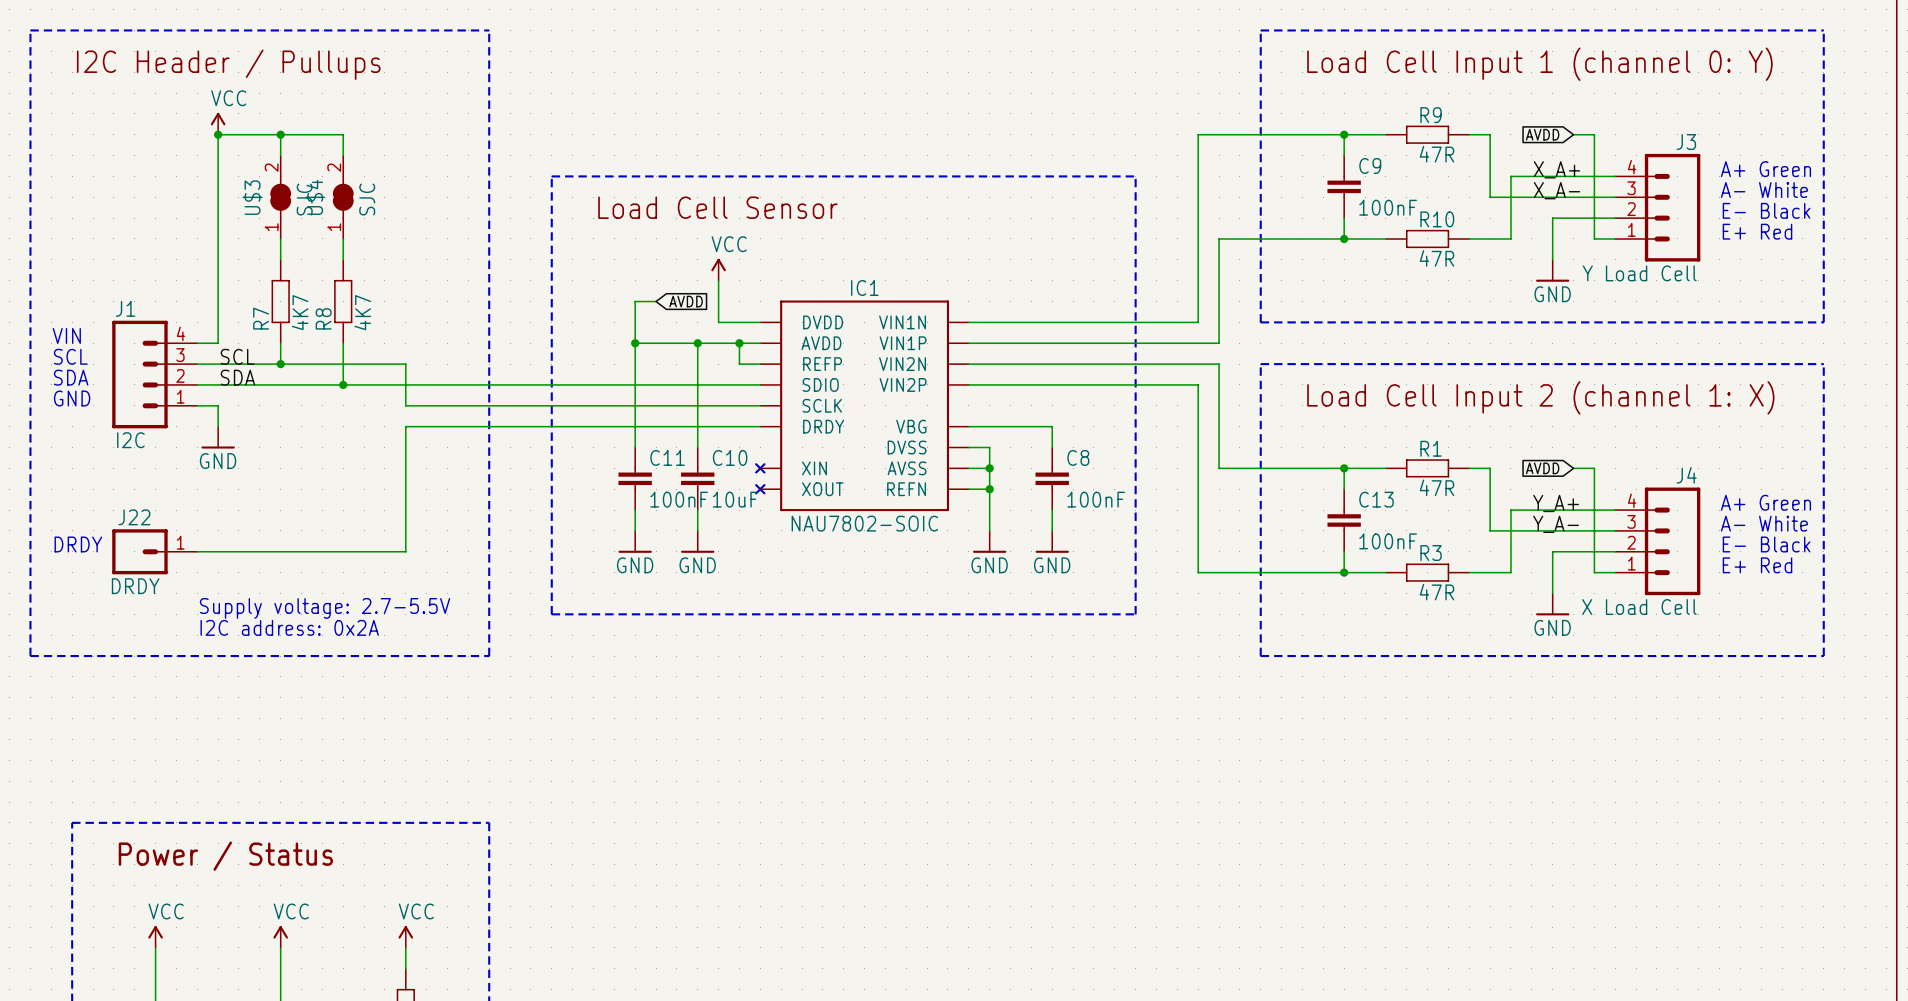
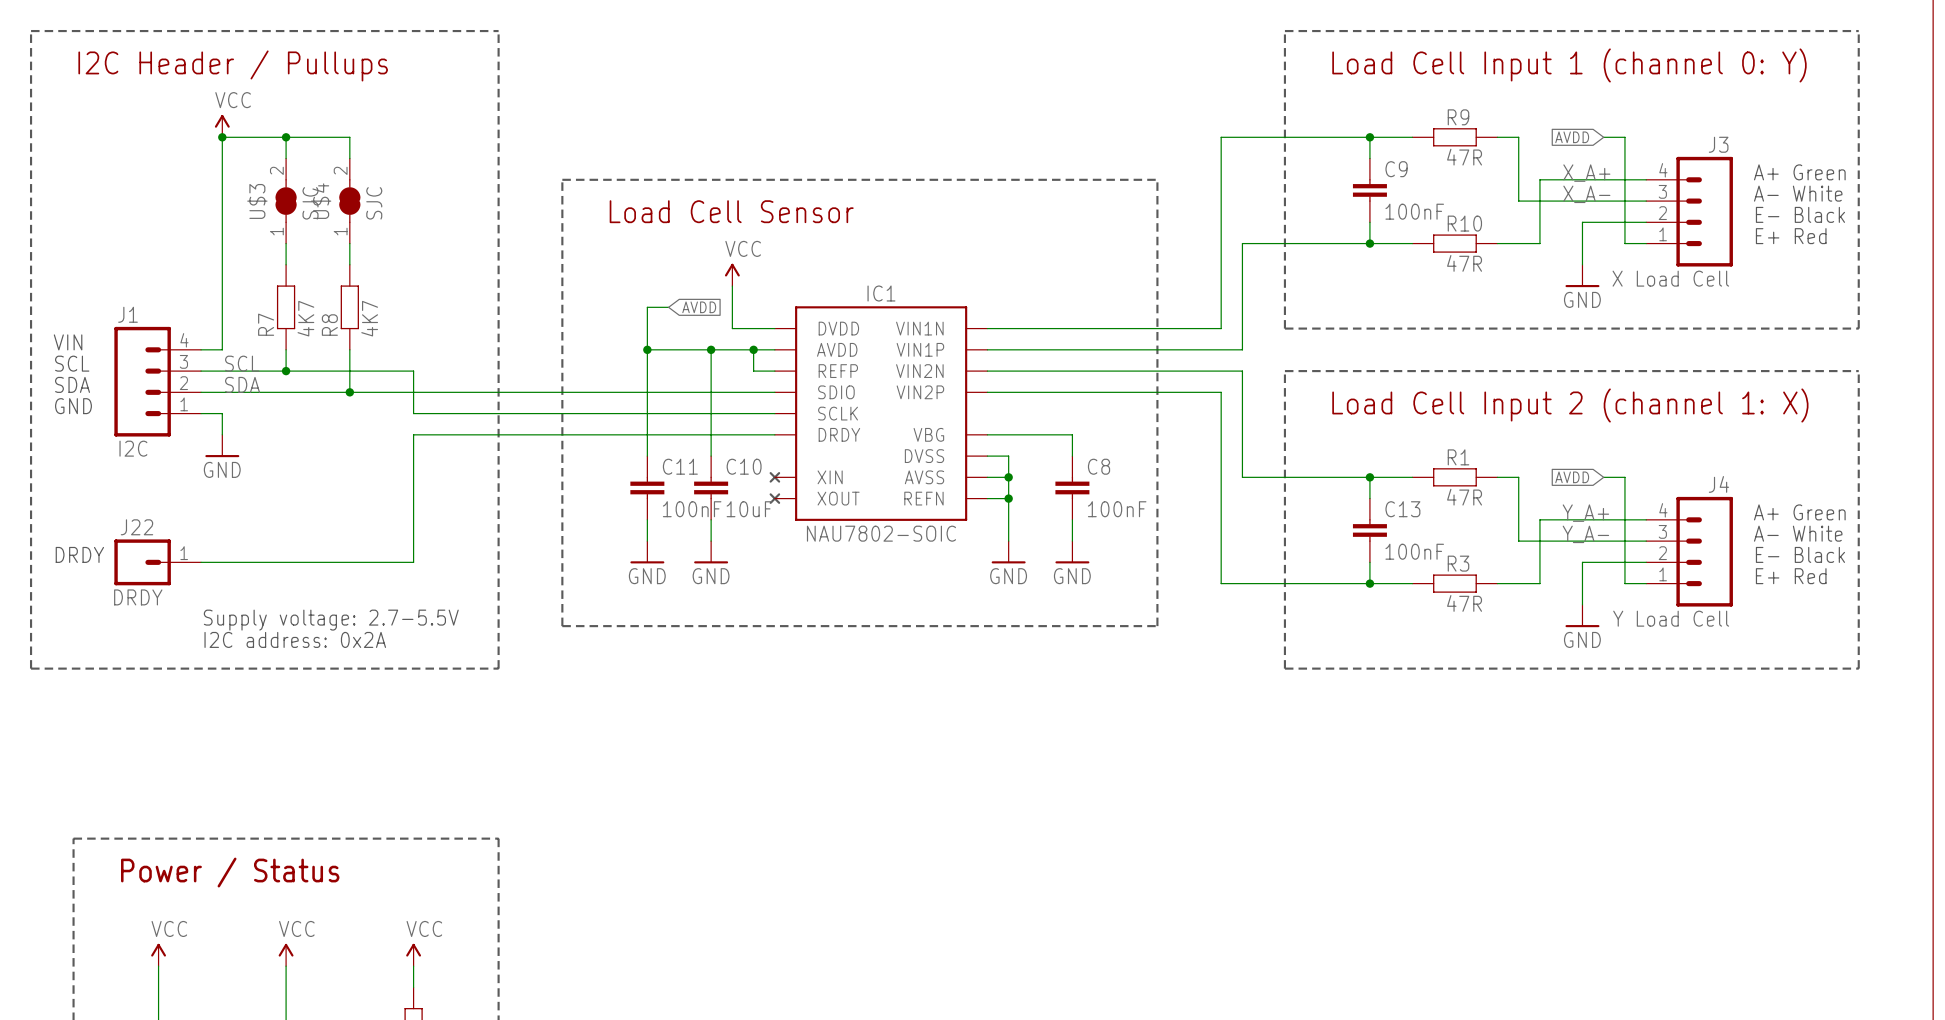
J3 value: Y Load Cell (1639, 273) -> X Load Cell (1670, 278)
J4 value: X Load Cell (1639, 607) -> Y Load Cell (1671, 618)

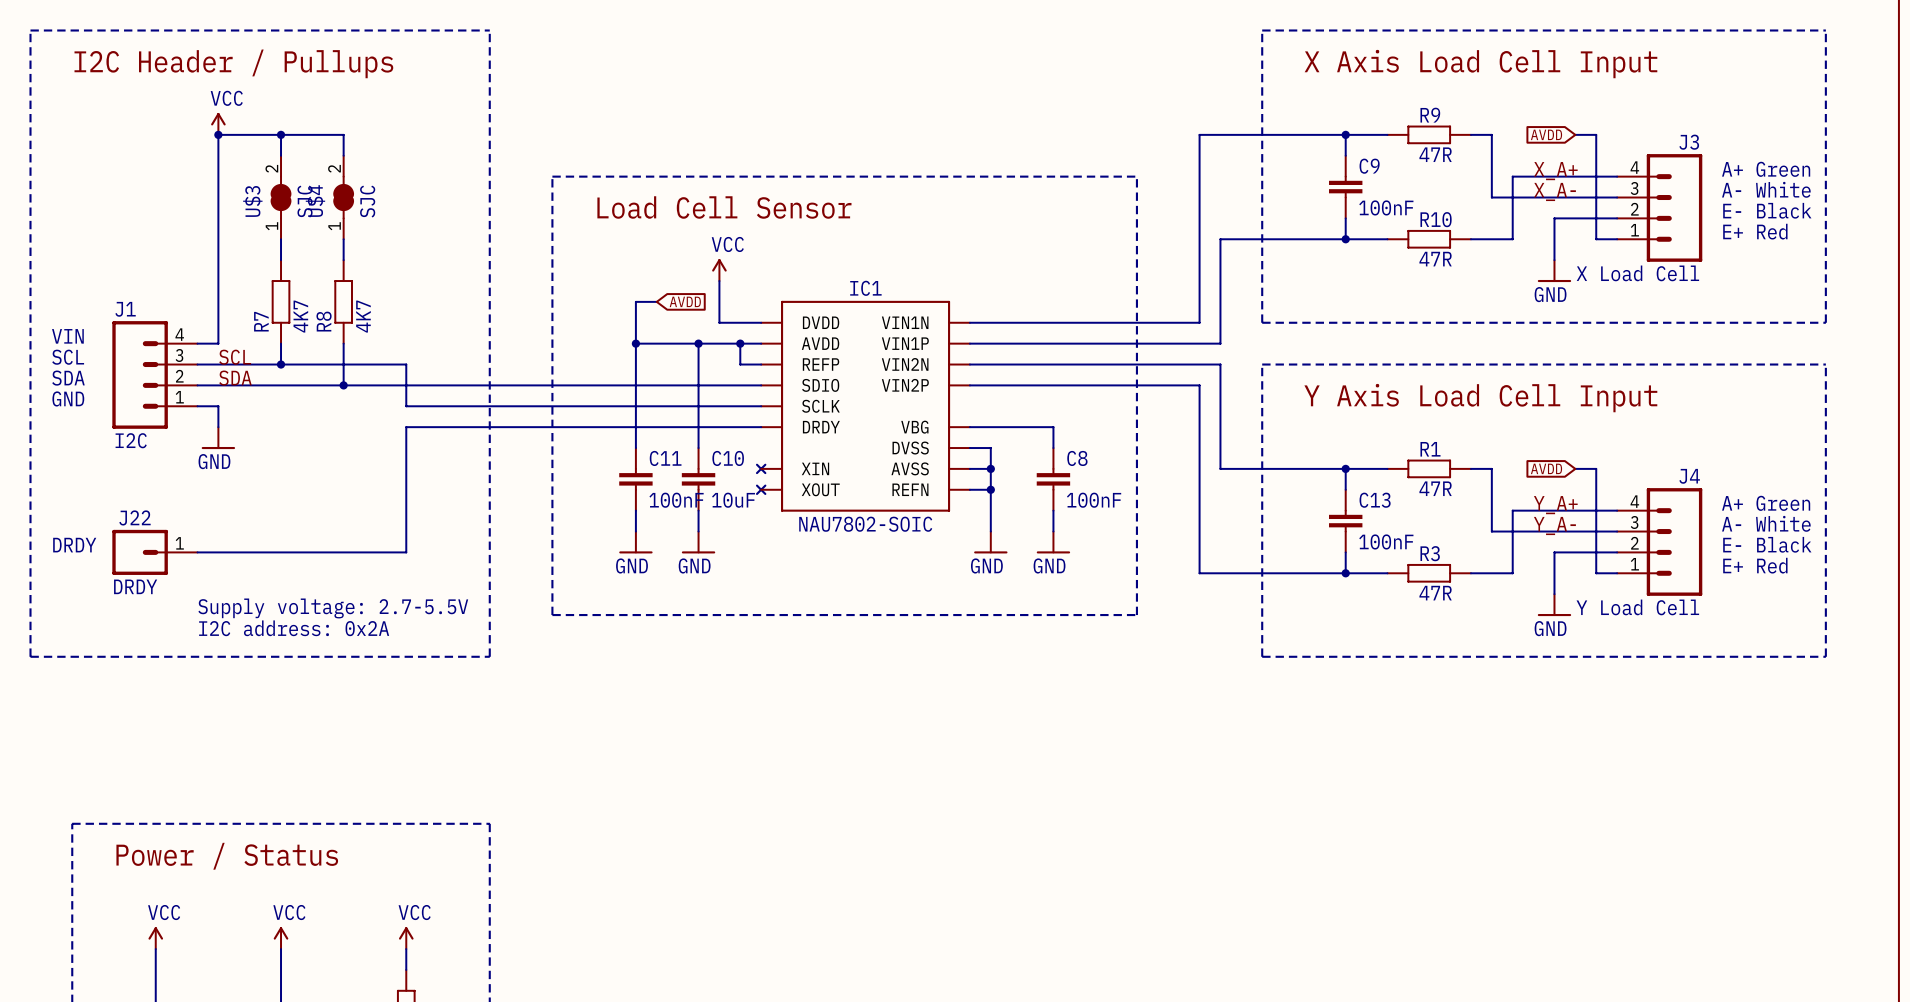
text: Load Cell Input 1 (channel 0: Y) (1569, 65) -> X Axis Load Cell Input (1480, 64)
text: Load Cell Input 2 (channel 1: X) (1570, 405) -> Y Axis Load Cell Input (1480, 398)

